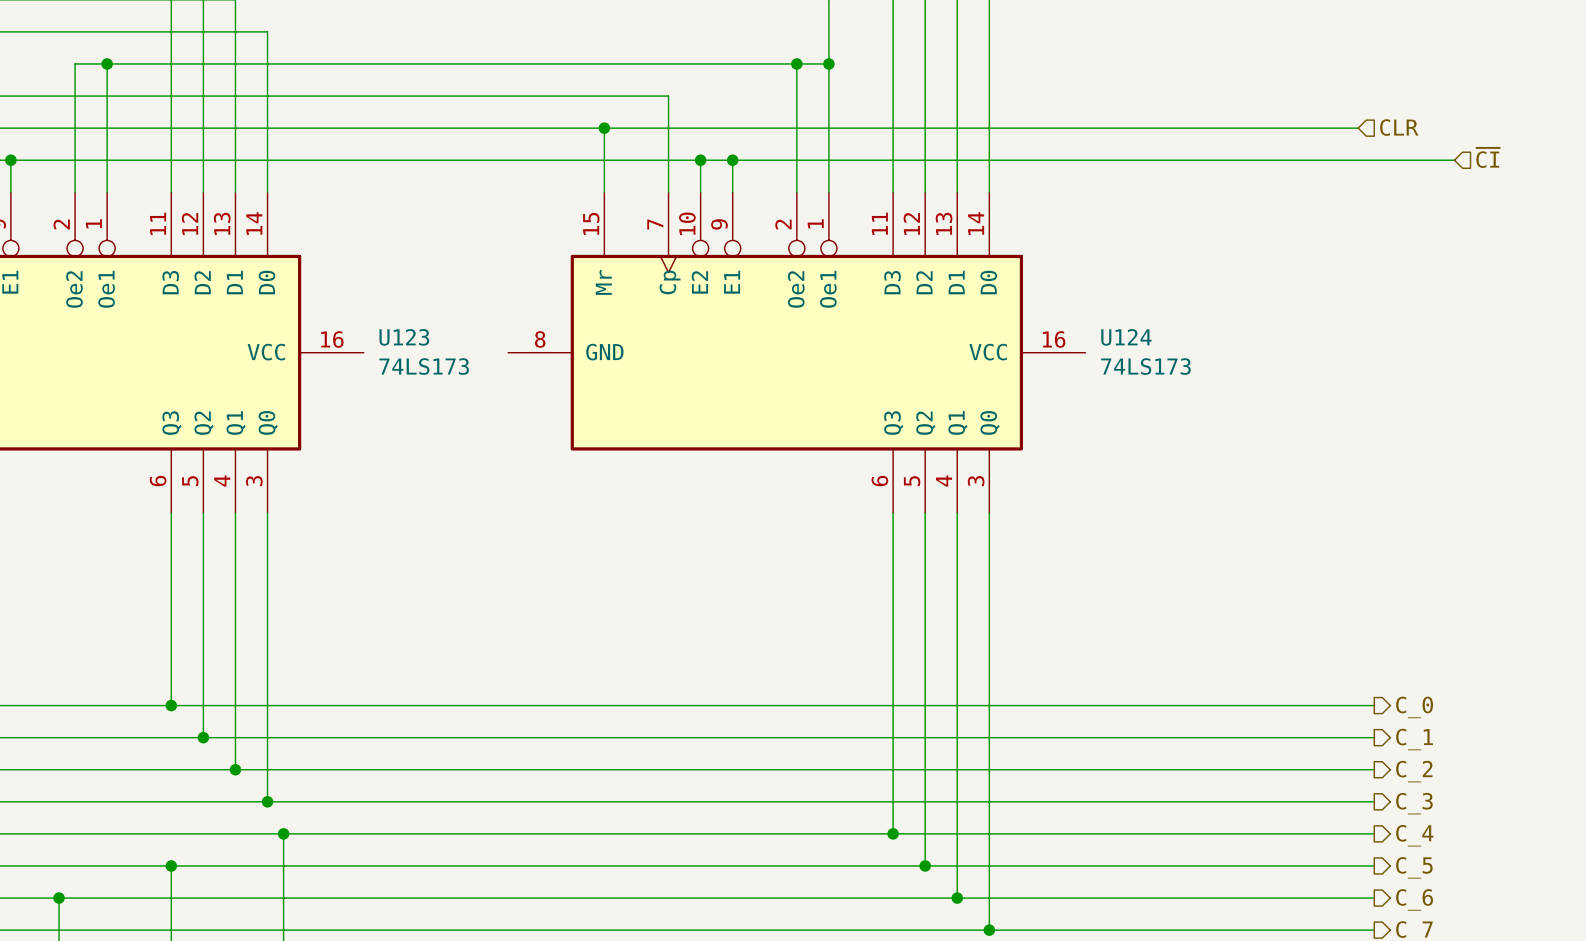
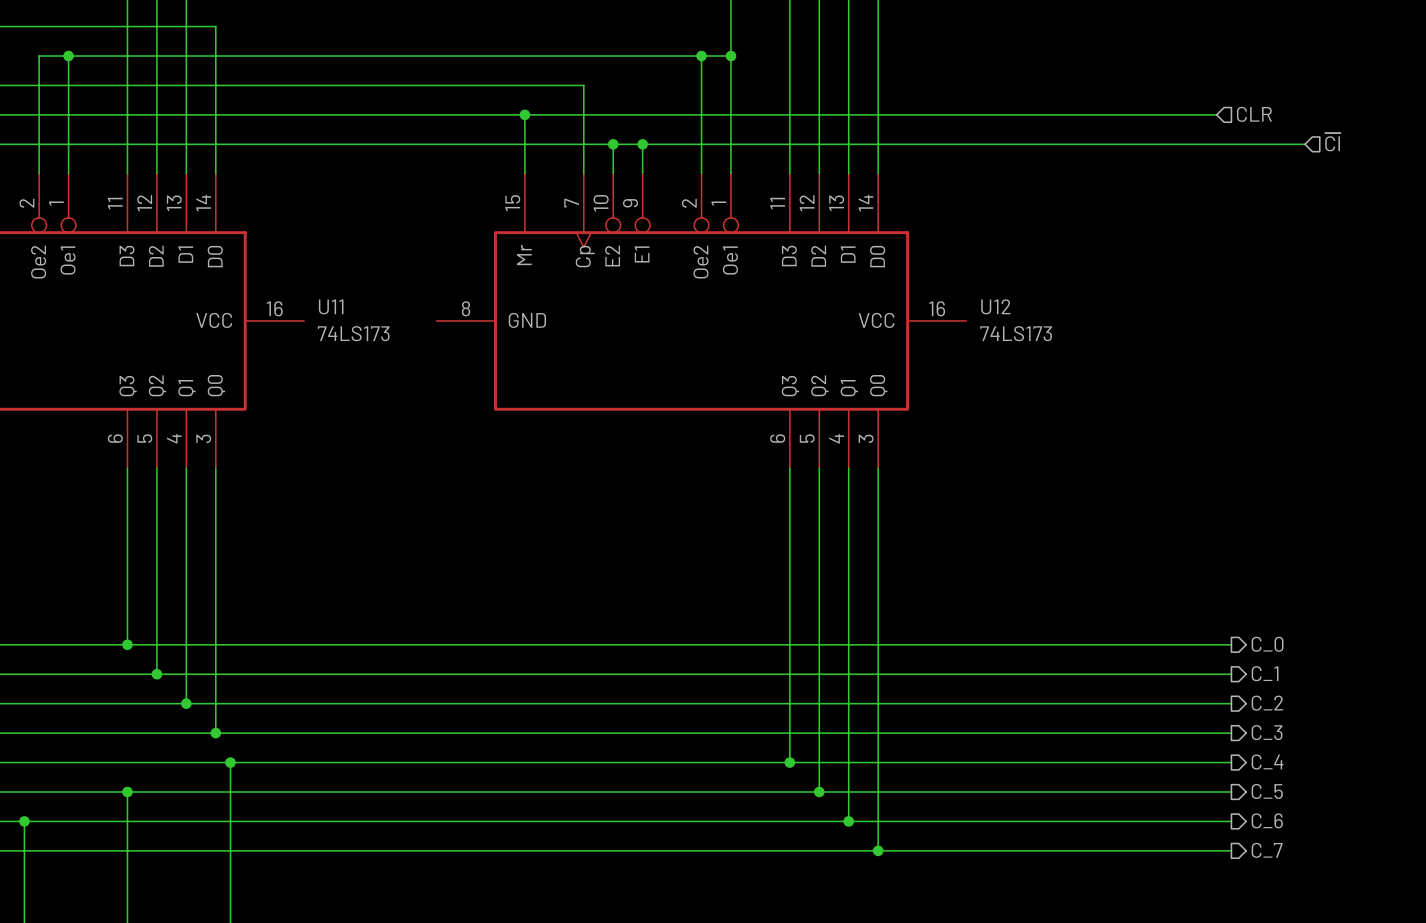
U123 name: U123 (404, 337) -> U11 (331, 306)
U124 name: U124 (1126, 337) -> U12 (995, 306)

